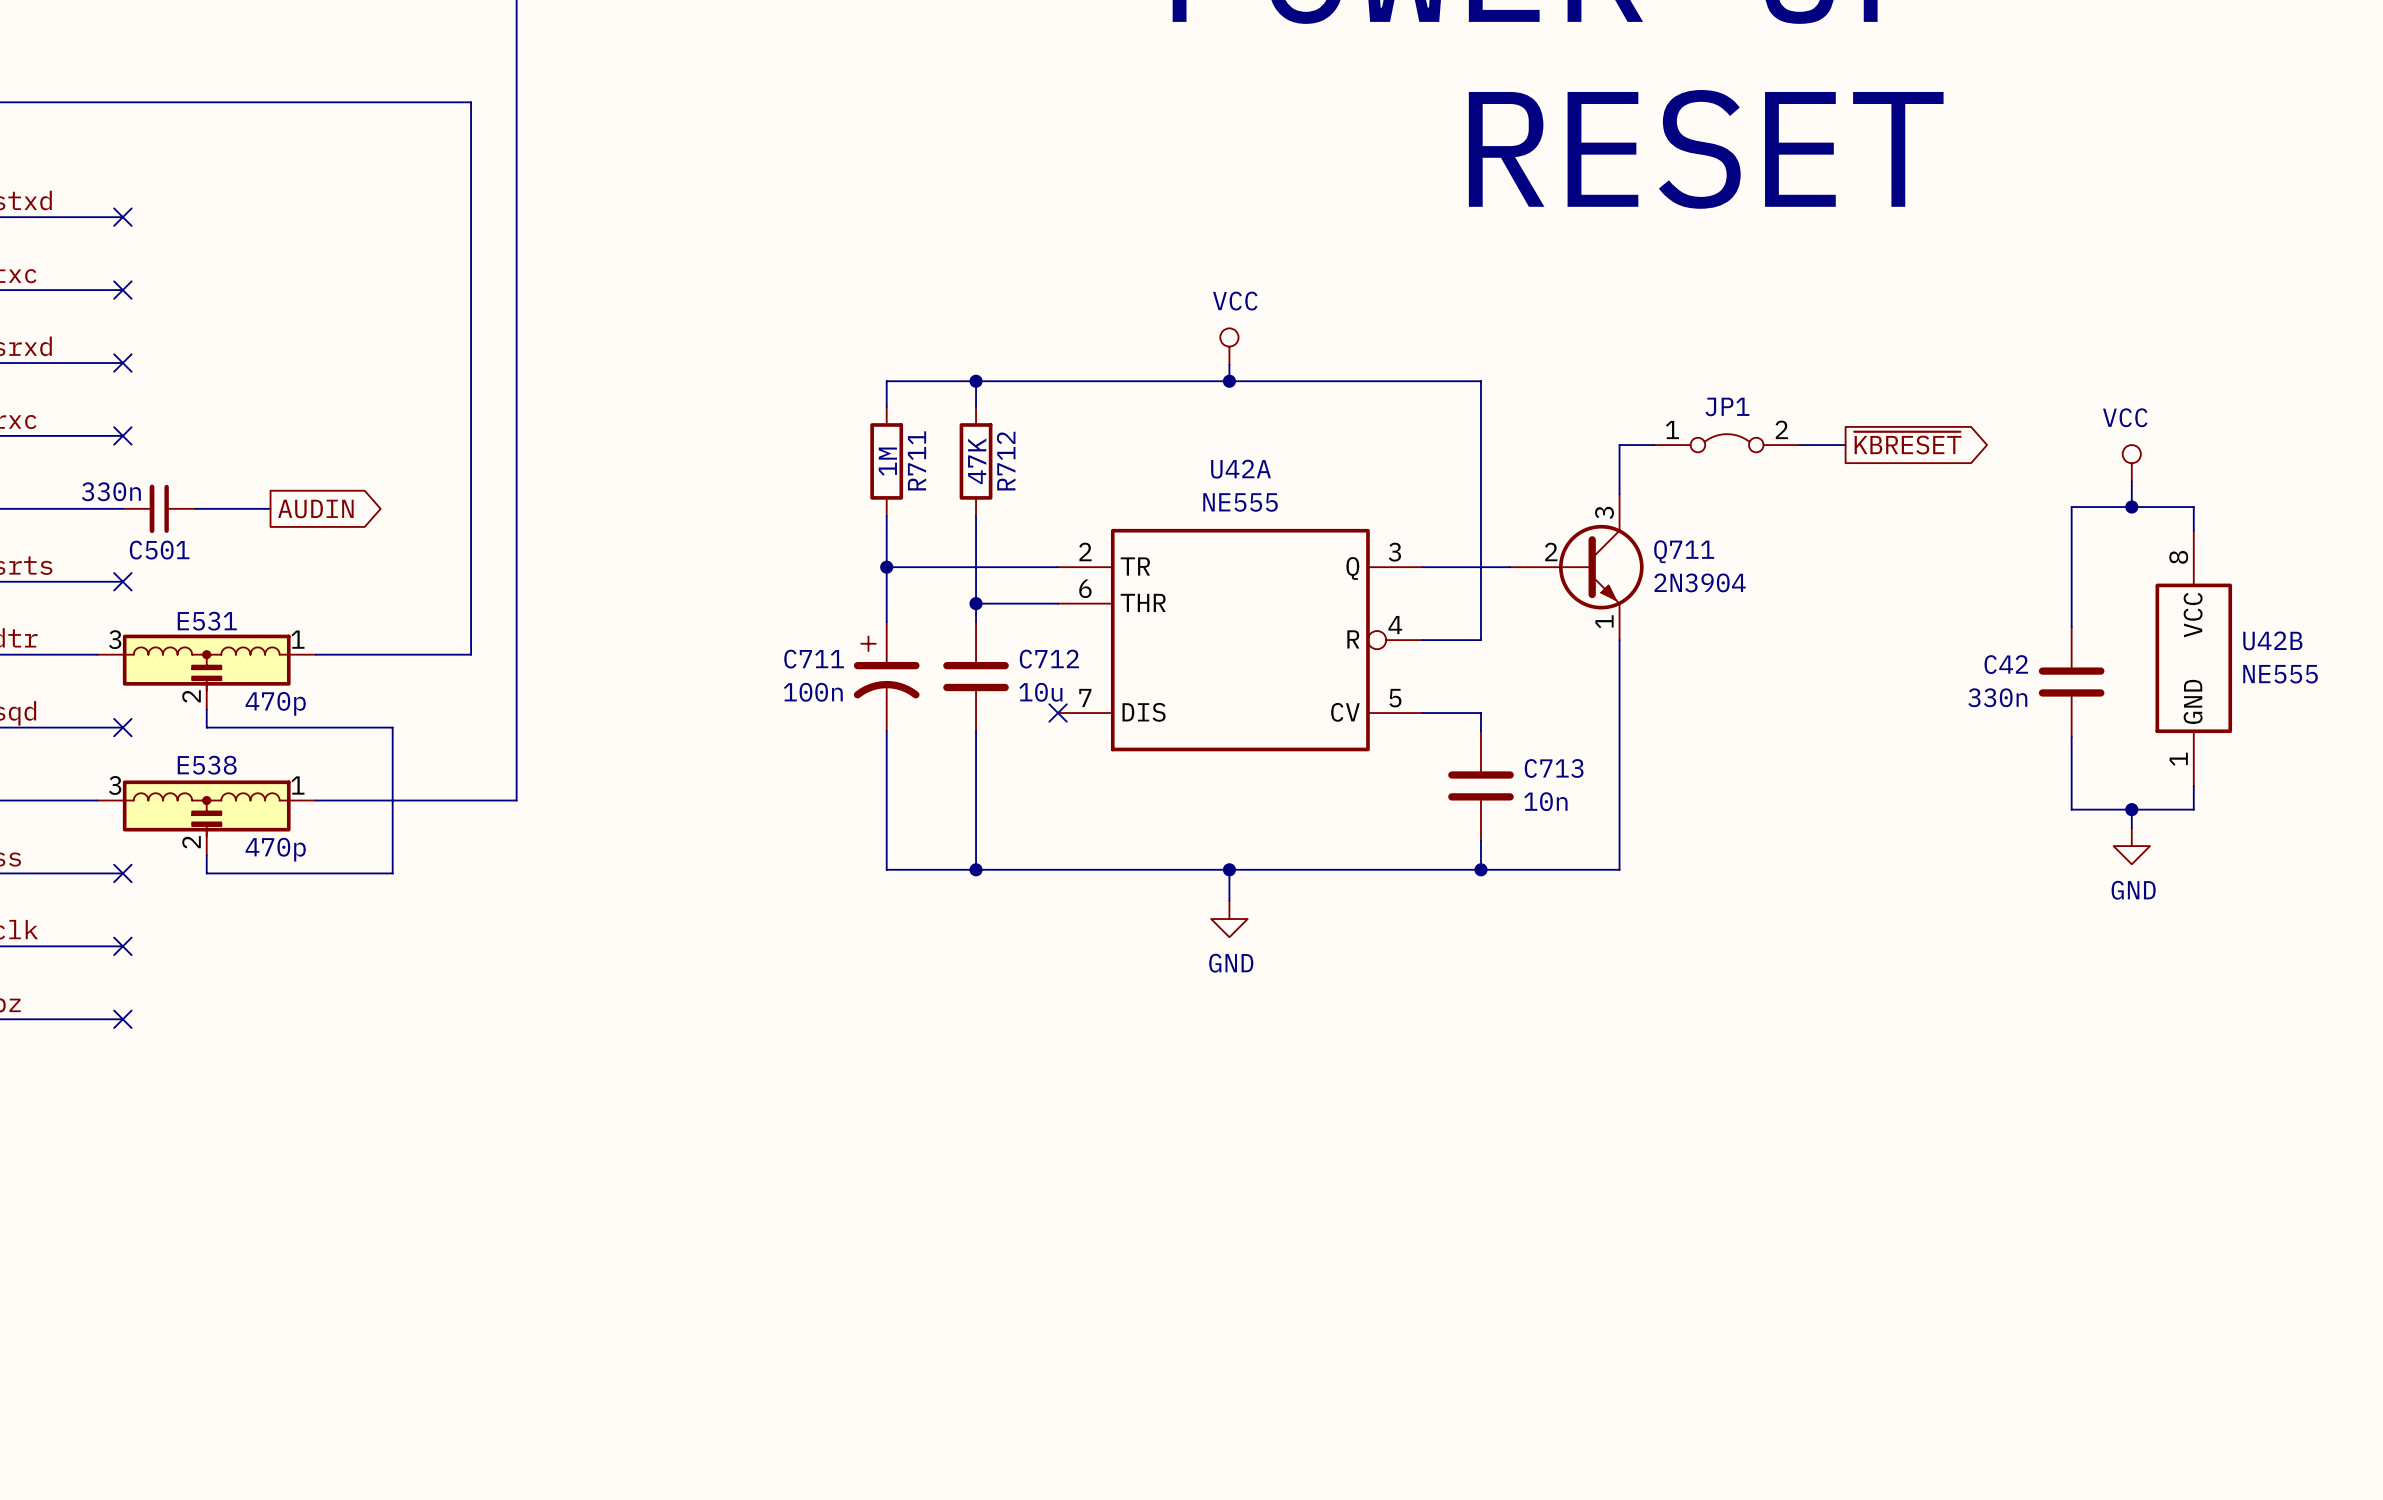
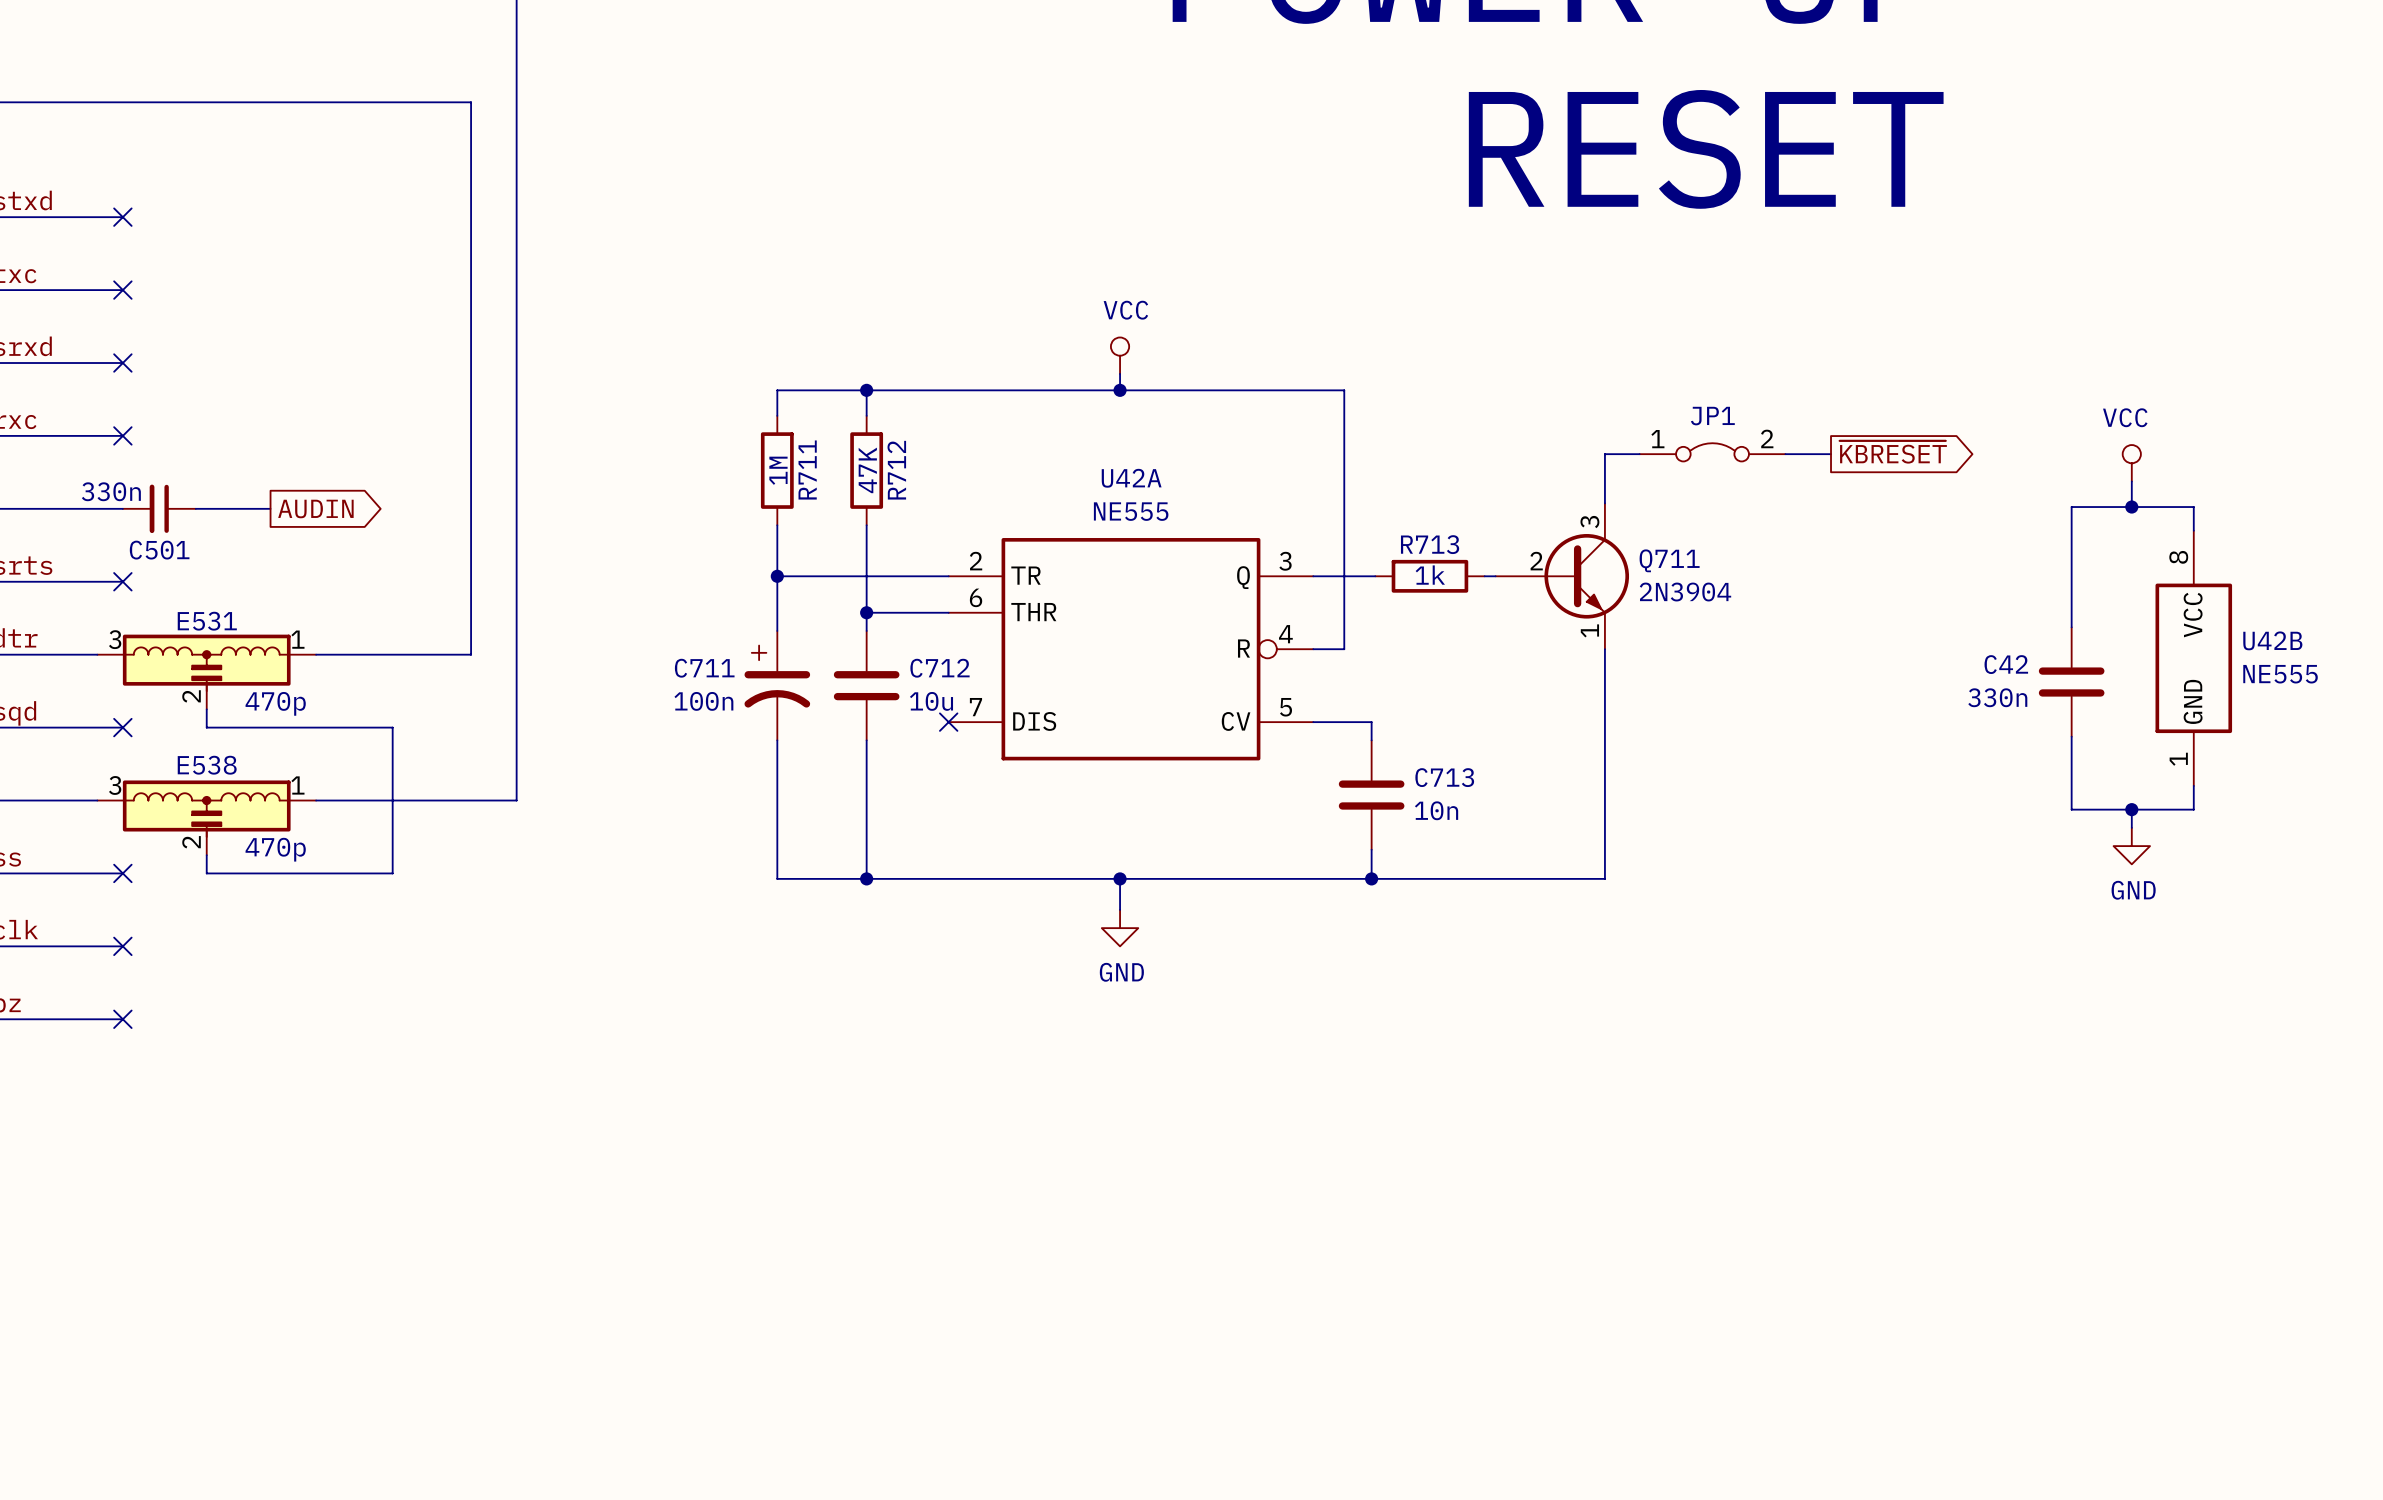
power symbol position: VCC (1229, 346) -> VCC (1120, 355)
wire: (1229, 364) (1229, 381) -> (1120, 373) (1120, 390)
wire: (976, 381) (976, 406) -> (866, 390) (866, 415)
junction: (976, 381) -> none
junction: (1229, 381) -> none
junction: none -> (866, 390)
junction: none -> (1120, 390)
wire: (886, 406) (886, 381) (1481, 381) (1481, 640) (1422, 640) -> none
wire: none -> (777, 415) (777, 390) (1344, 390) (1344, 649) (1313, 649)
JP1 position: (1727, 443) -> (1712, 452)
global label position: ~{KBRESET} (1907, 443) -> ~{KBRESET} (1893, 452)
wire: (1654, 445) (1619, 445) (1619, 494) -> (1639, 454) (1604, 454) (1604, 503)
wire: (1800, 445) (1845, 445) -> (1785, 454) (1831, 454)
R711 position: (886, 461) -> (777, 470)
R712 position: (976, 461) -> (866, 470)
wire: (886, 516) (886, 621) -> (777, 525) (777, 630)
wire: (976, 516) (976, 621) -> (866, 525) (866, 630)
wire: (886, 567) (1058, 567) -> (777, 576) (948, 576)
junction position: (886, 567) -> (866, 612)
wire: (1422, 567) (1510, 567) -> none
Q711 position: (1576, 567) -> (1562, 576)
junction: none -> (777, 576)
wire: none -> (1313, 576) (1375, 576)
R713: none -> 1k (1429, 576)
wire: none -> (1484, 576) (1495, 576)
wire: (976, 603) (1058, 603) -> (866, 612) (948, 612)
junction: (976, 603) -> none
U42A position: (1240, 640) -> (1130, 649)
wire: (1619, 640) (1619, 869) (886, 869) (886, 731) -> none
wire: none -> (1604, 649) (1604, 878) (777, 878) (777, 740)
C711 position: (886, 676) -> (777, 685)
C712 position: (976, 676) -> (866, 685)
no-connect mark: (1058, 713) -> none
wire: (1422, 713) (1481, 713) (1481, 731) -> (1313, 722) (1371, 722) (1371, 740)
no-connect mark: none -> (948, 722)
wire: (976, 731) (976, 869) -> (866, 740) (866, 878)
C713 position: (1481, 785) -> (1371, 795)
wire: (1481, 840) (1481, 869) -> (1371, 849) (1371, 878)
junction: (976, 869) -> none
wire: (1229, 869) (1229, 900) -> (1120, 878) (1120, 909)
junction: (1229, 869) -> none
junction: (1481, 869) -> none
junction: none -> (866, 878)
junction: none -> (1120, 878)
junction: none -> (1371, 878)
power symbol position: GND (1229, 919) -> GND (1120, 928)

